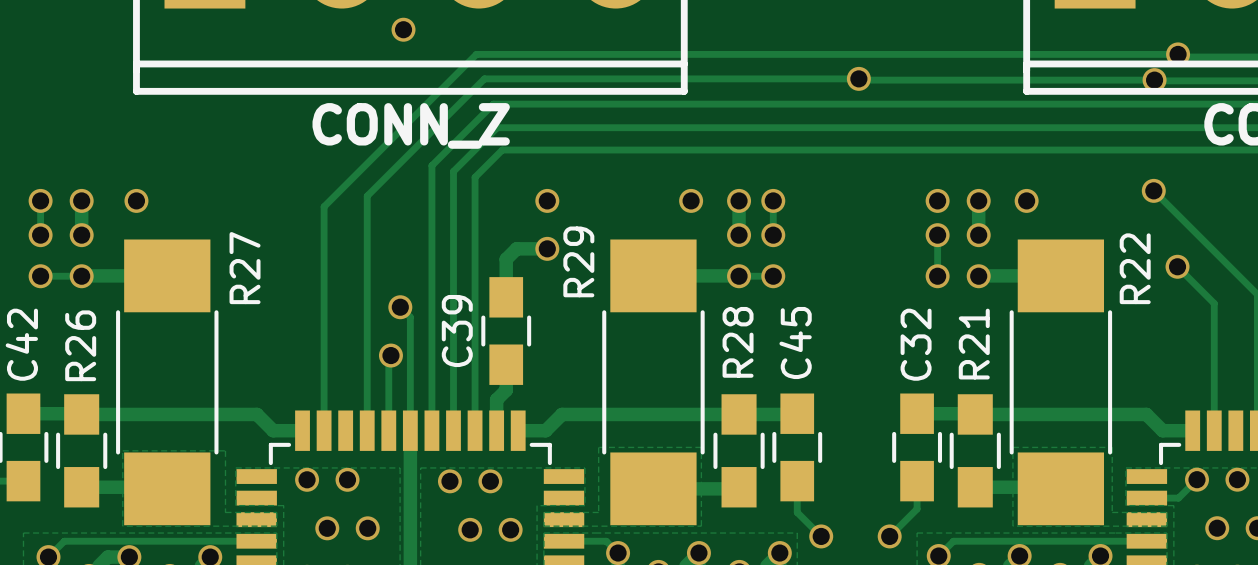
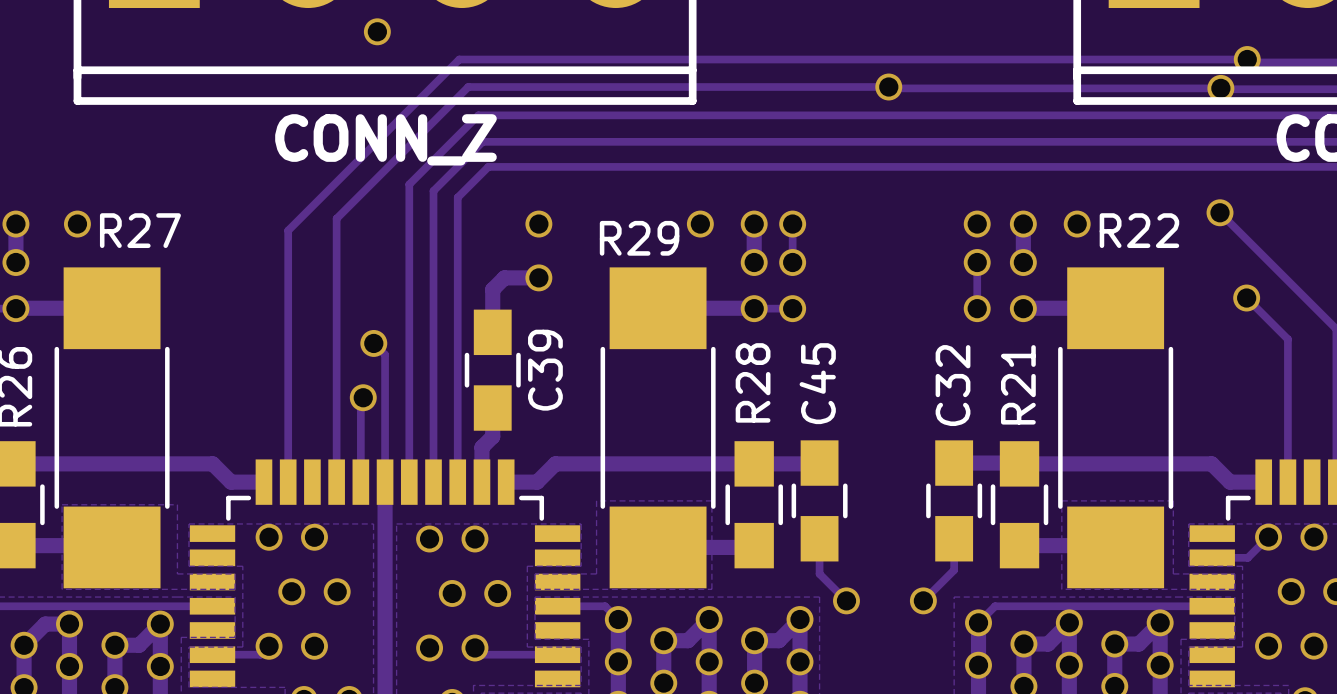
R29 name rotation: 0° (578, 261) -> 90° clockwise (639, 238)
R27 name rotation: 0° (245, 268) -> 90° clockwise (140, 230)
R22 name rotation: 0° (1135, 268) -> 90° clockwise (1139, 230)
C39 name position: C39 (457, 331) -> C39 (545, 370)

